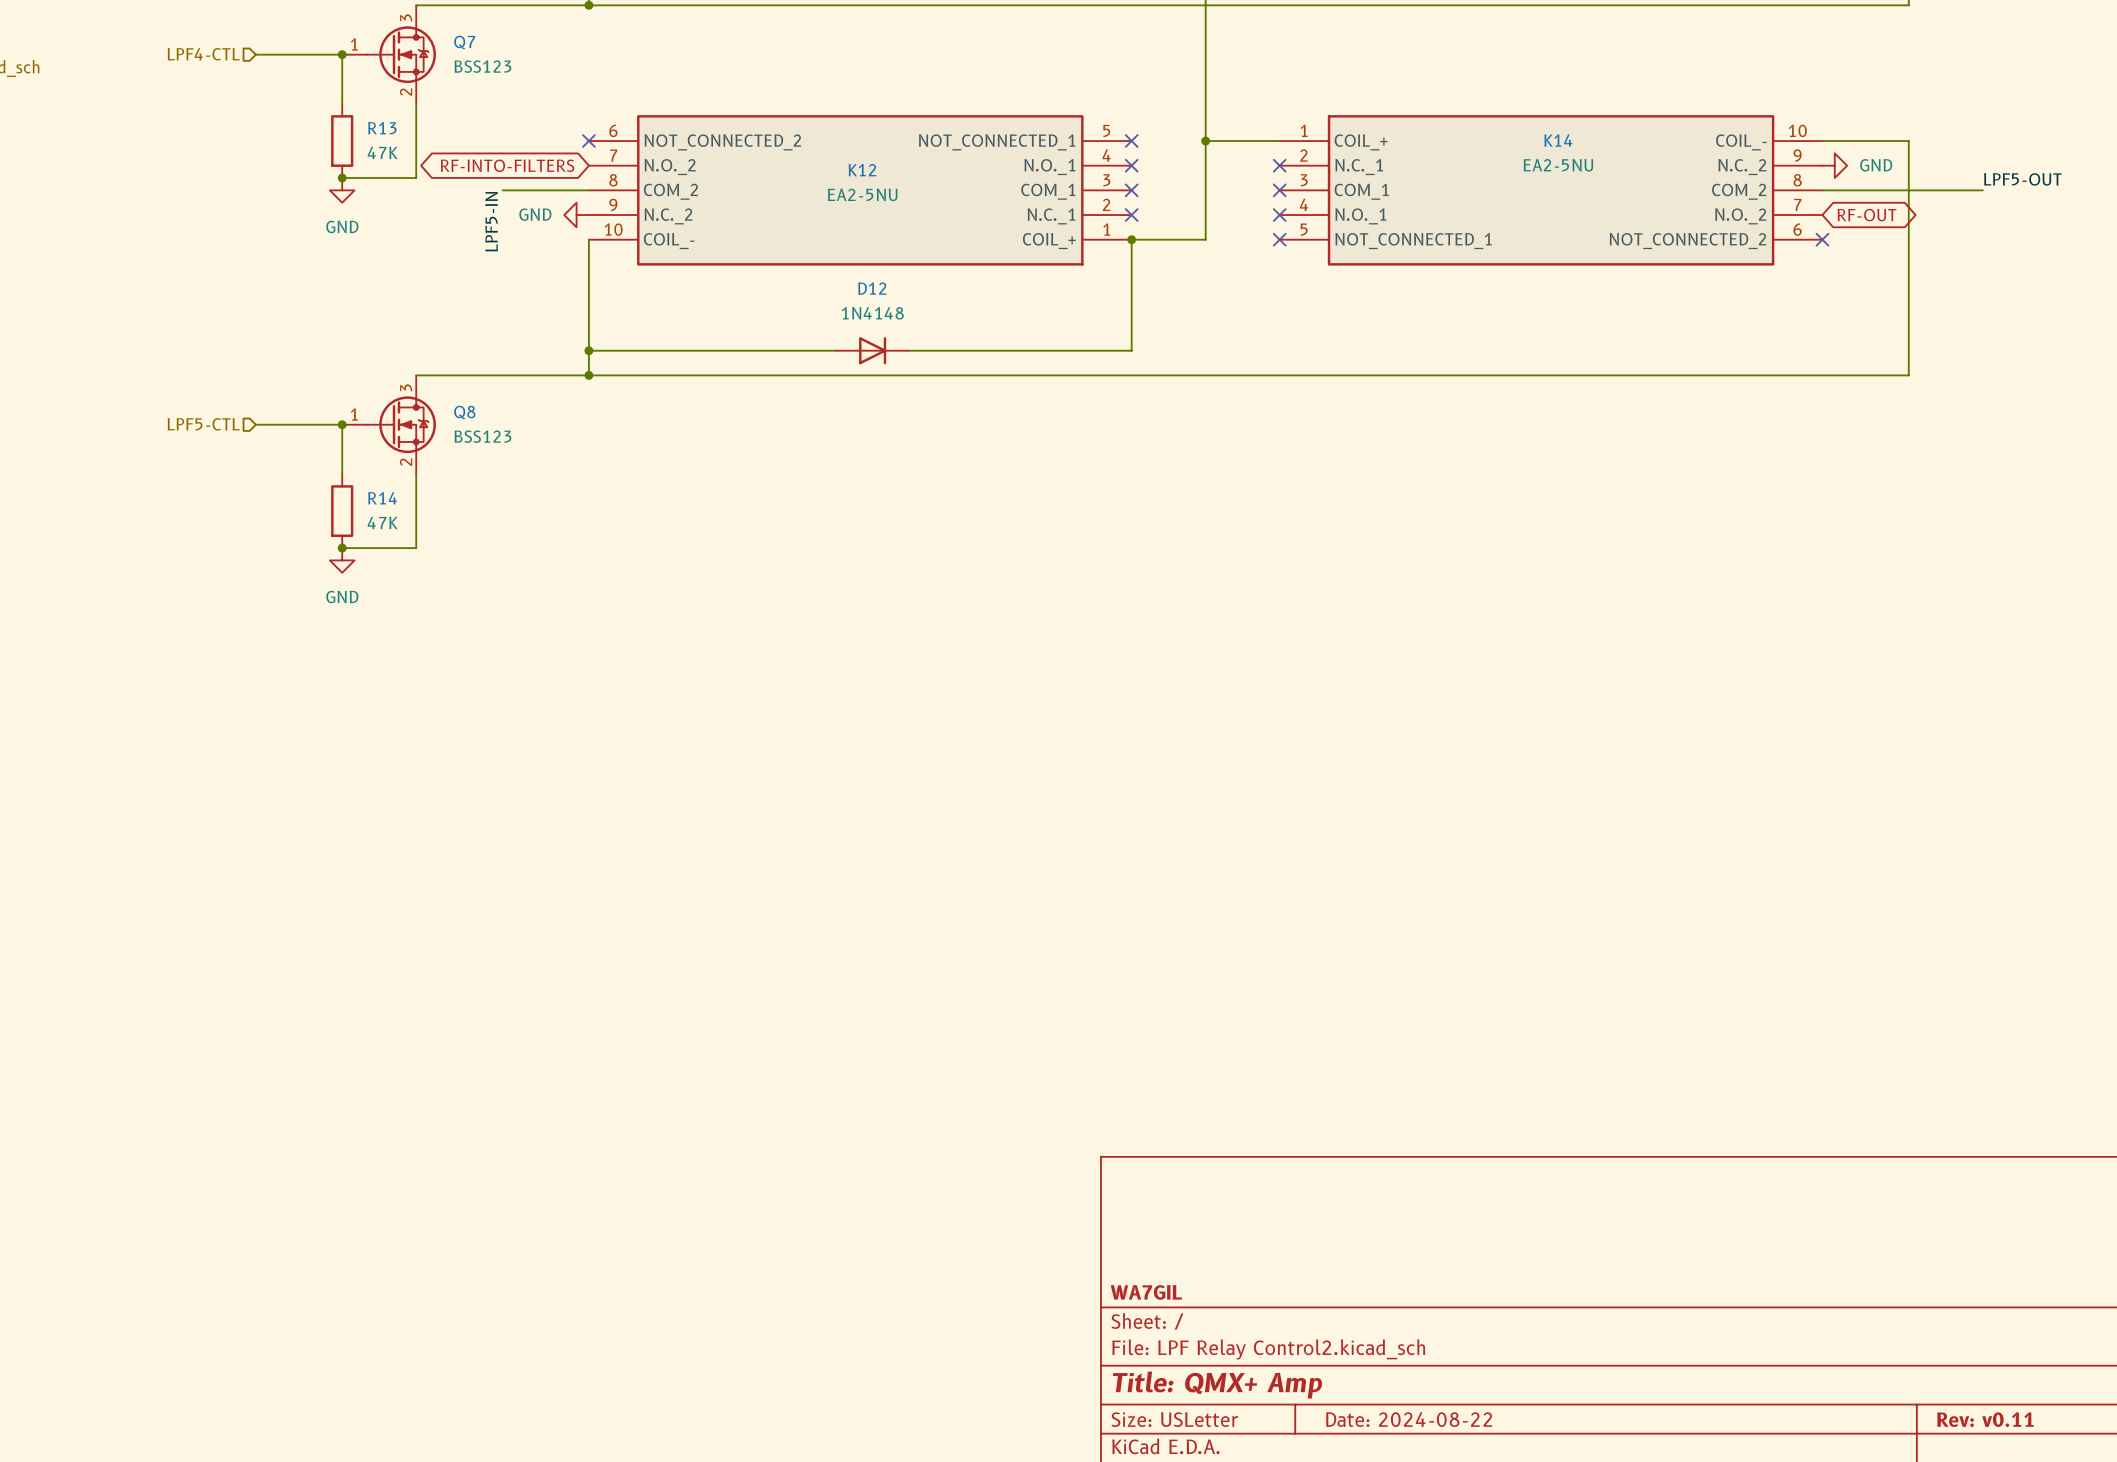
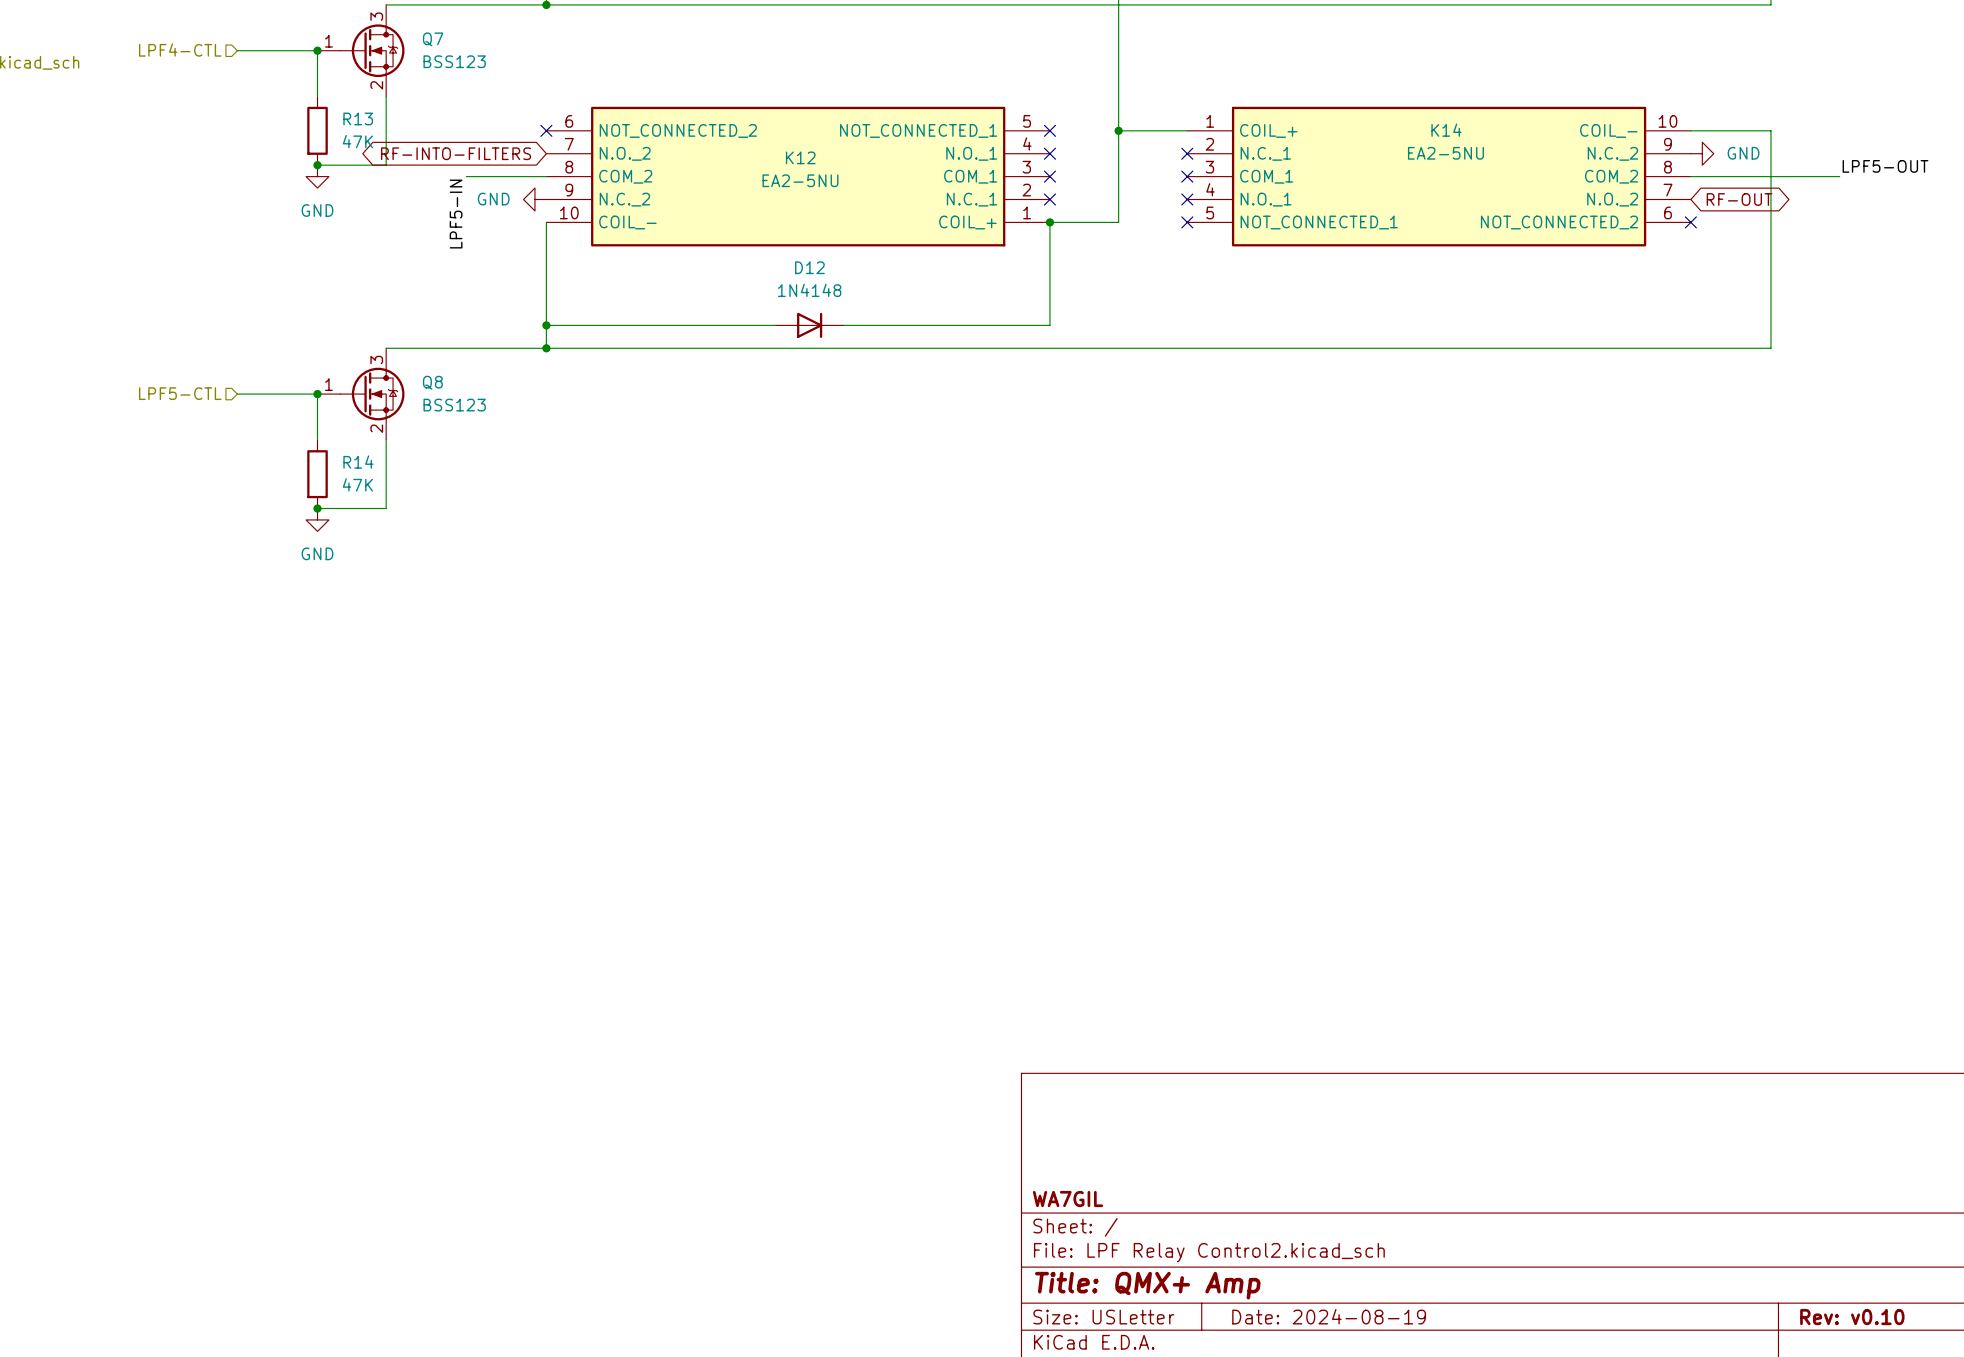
title block: Date: 2024-08-22 (1409, 1419) -> Date: 2024-08-19 (1329, 1316)
title block: Rev: v0.11 (1985, 1419) -> Rev: v0.10 (1852, 1317)

